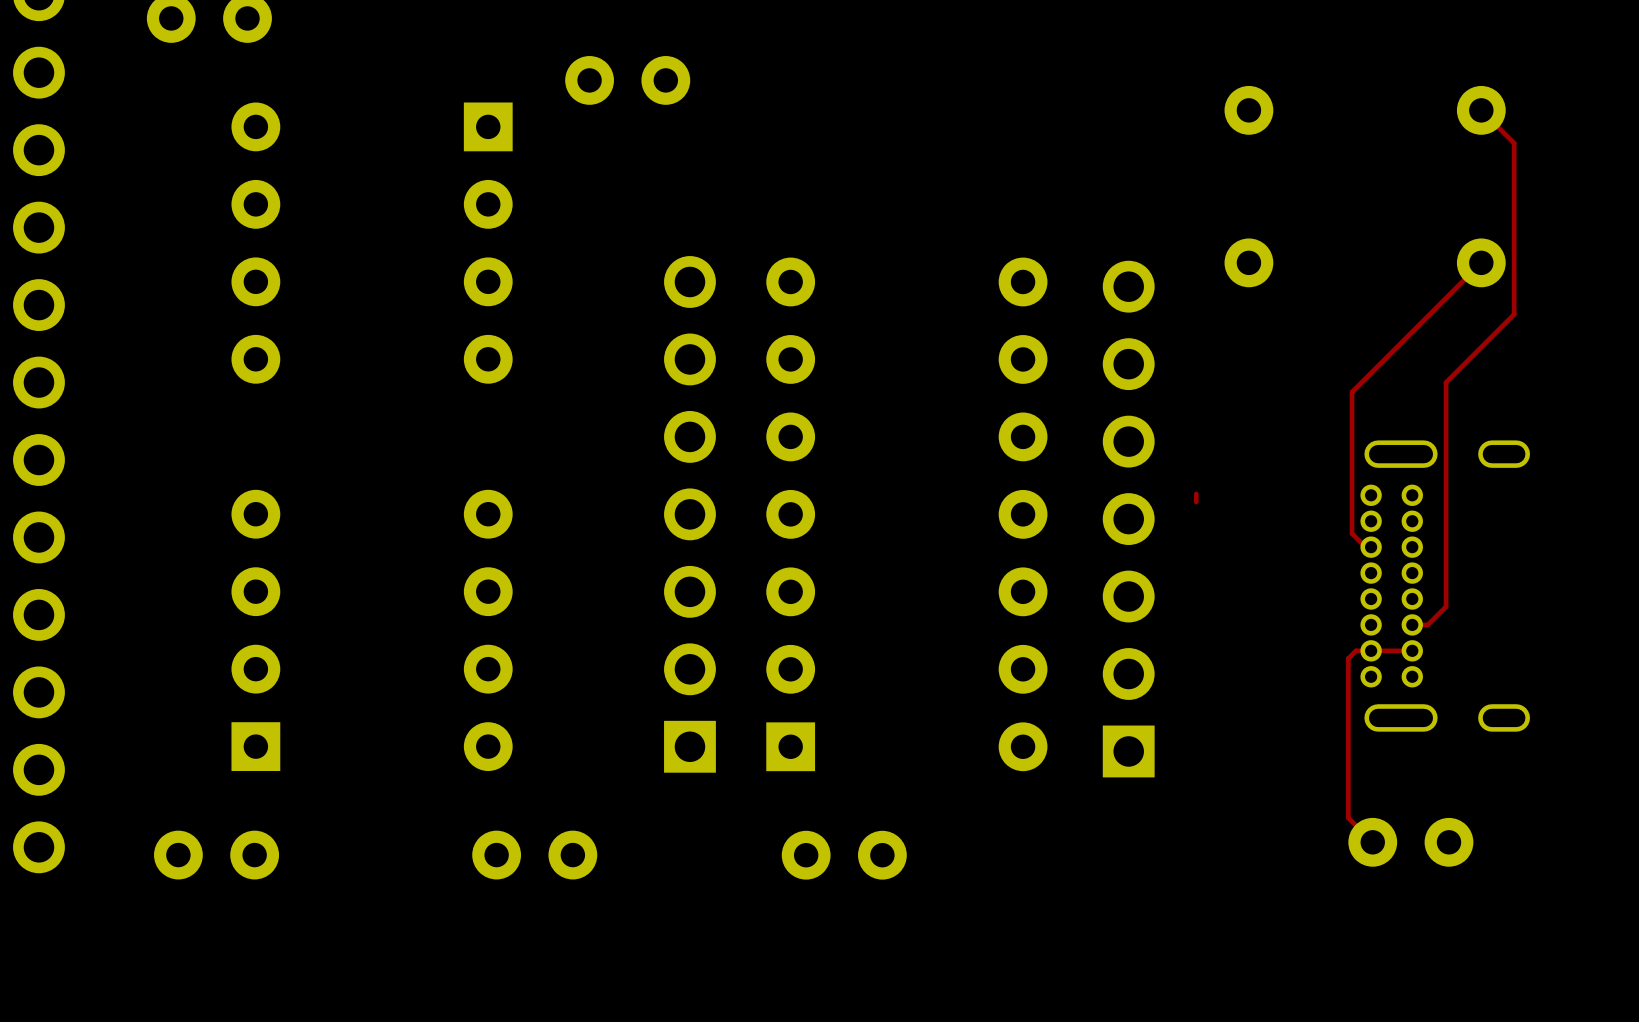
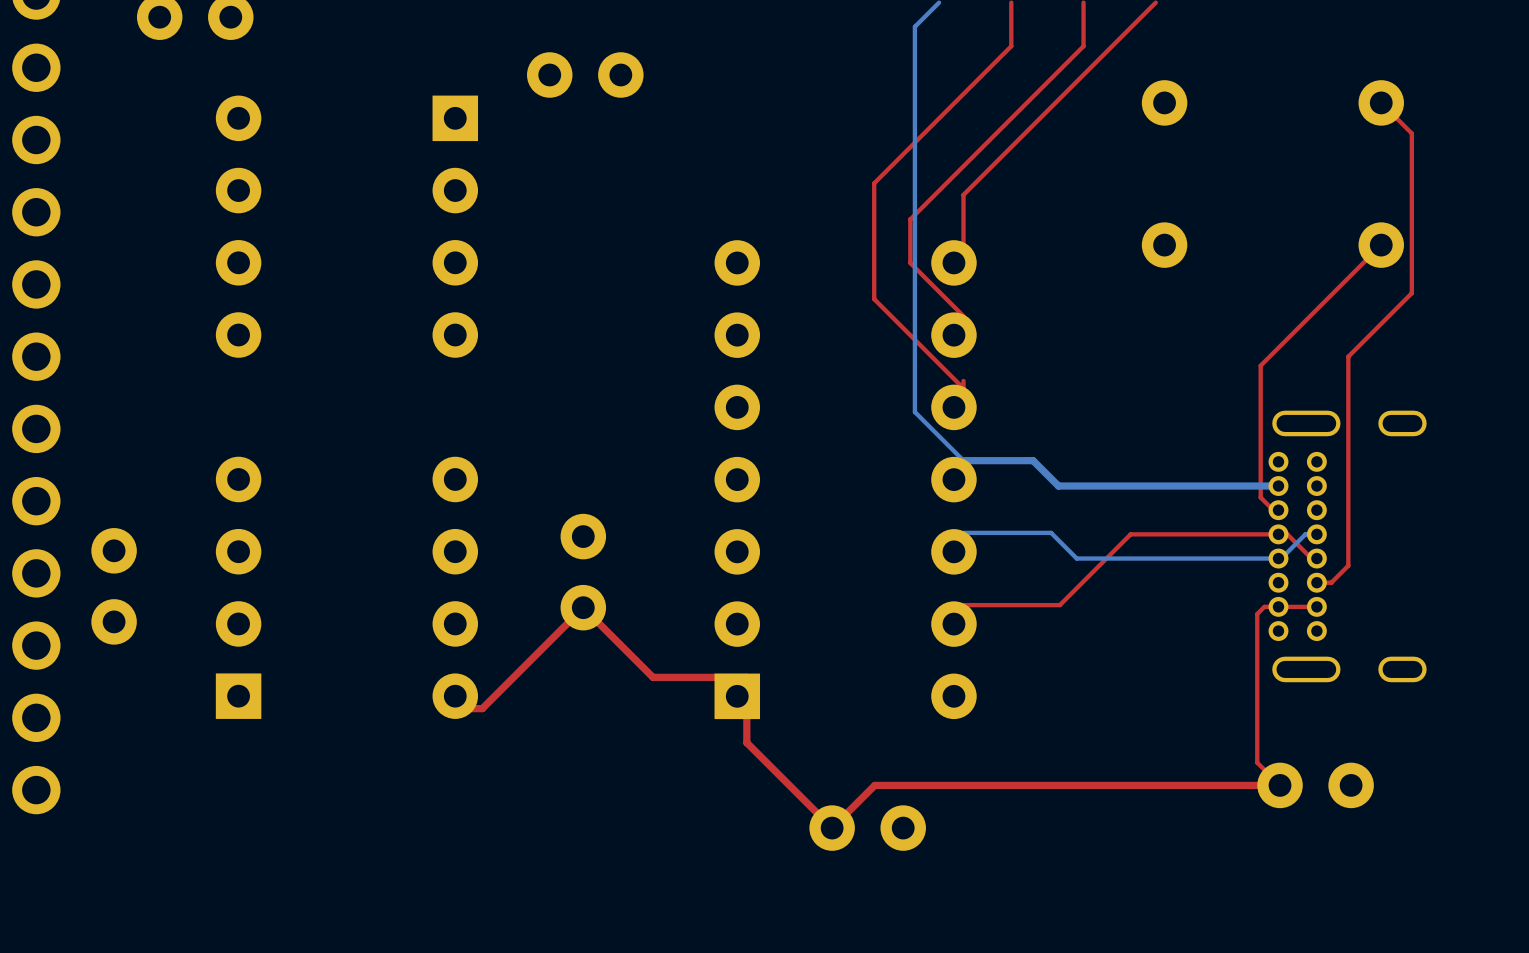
bottom track: none -> (939, 2) (914, 26) (914, 412) (963, 460) (1033, 460) (1058, 486) (1278, 486)
top track: none -> (1011, 2) (1011, 46) (874, 183) (874, 299) (963, 388) (963, 380)
top track: none -> (1083, 2) (1083, 46) (910, 219) (910, 263) (963, 316)
top track: none -> (1155, 2) (963, 194) (963, 243)
top track: (1196, 493) (1196, 501) -> none
part: (689, 514) -> none
part: (1128, 519) -> none
bottom track: none -> (963, 532) (1051, 532) (1076, 558) (1281, 558) (1305, 534) (1316, 534)
top track: none -> (1316, 558) (1311, 558) (1287, 534) (1130, 534) (1059, 605) (963, 605)
part: none -> (583, 572)
part: none -> (114, 586)
top track: none -> (451, 708) (482, 708) (583, 607) (652, 677) (746, 677) (746, 742) (832, 828) (874, 785) (1280, 785)
part: (216, 855) -> none
part: (534, 855) -> none
part position: (844, 855) -> (867, 828)

